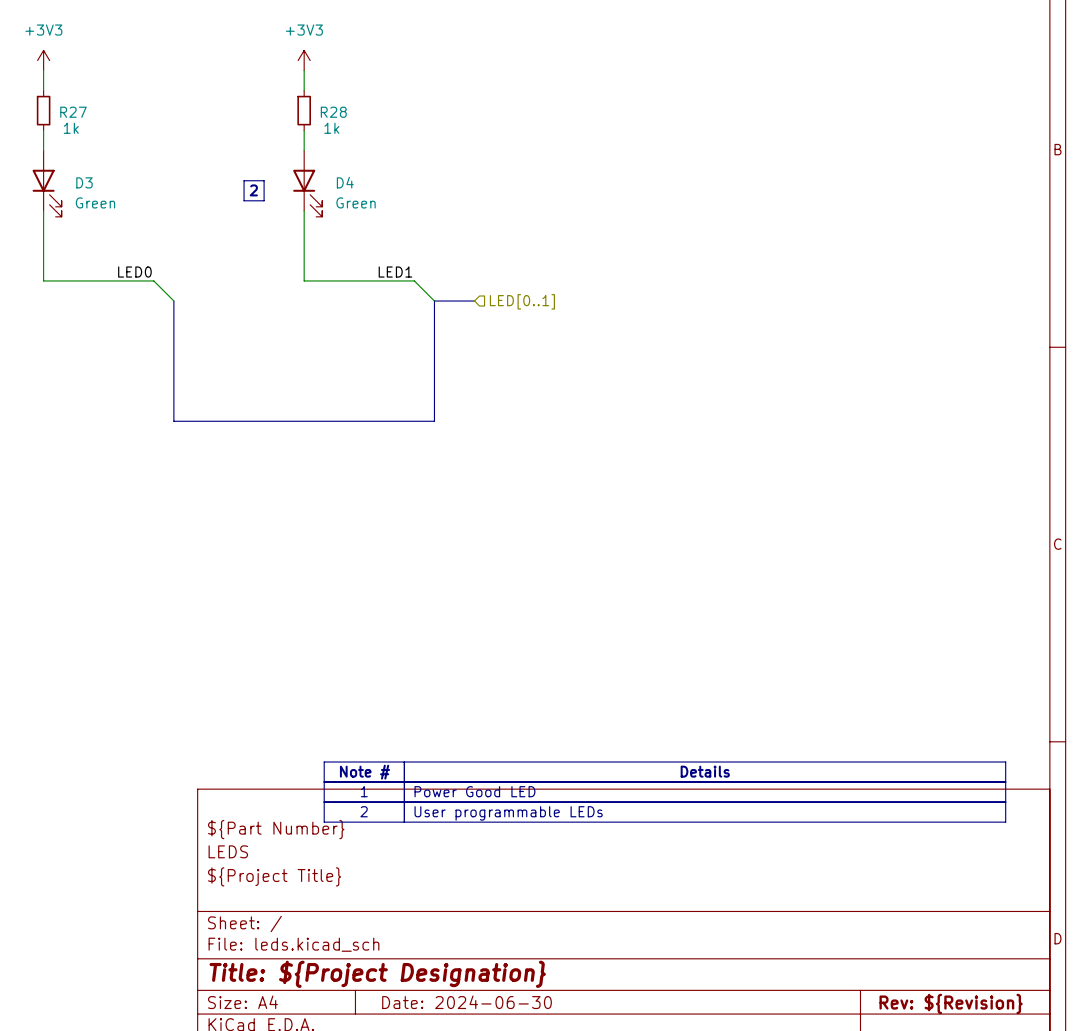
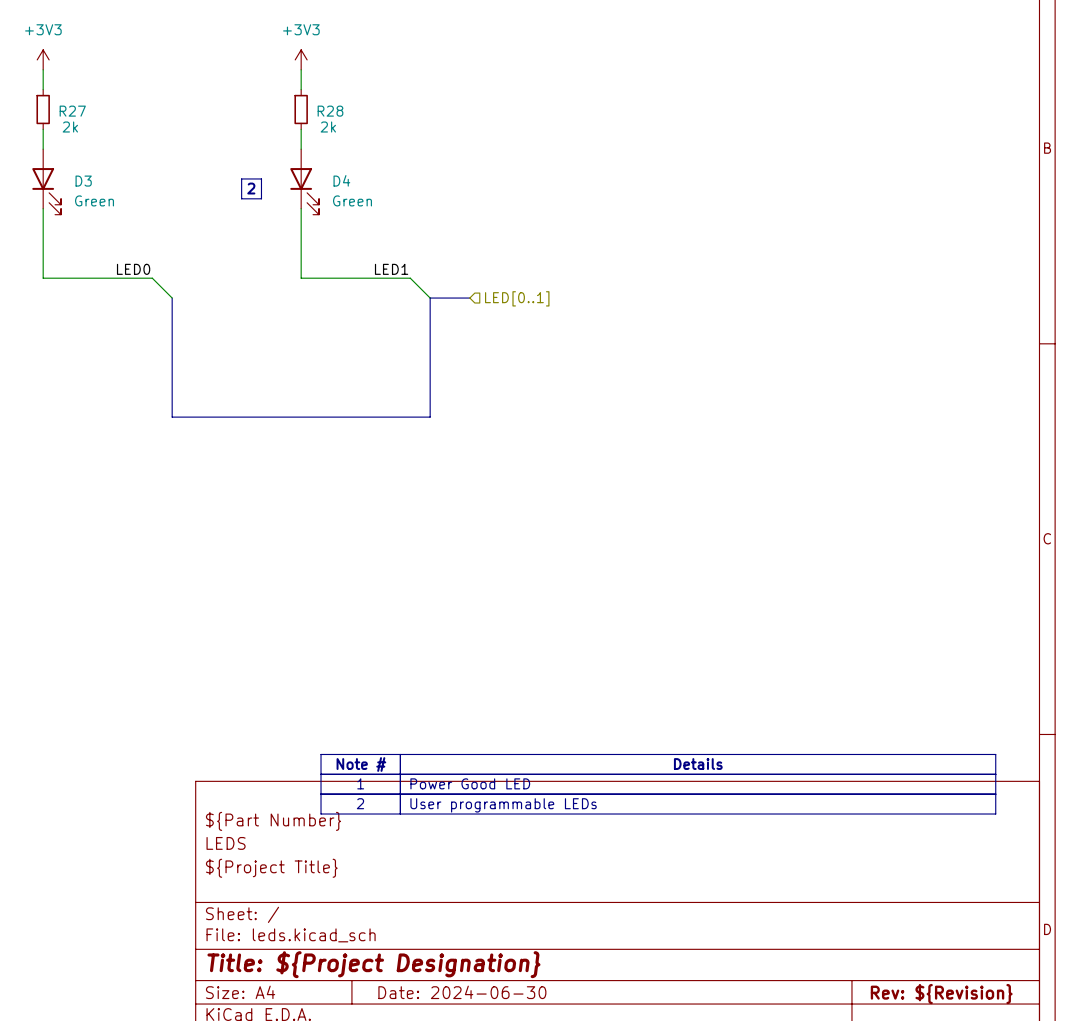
R27 value: 1k (71, 128) -> 2k (70, 127)
R28 value: 1k (331, 128) -> 2k (328, 127)

